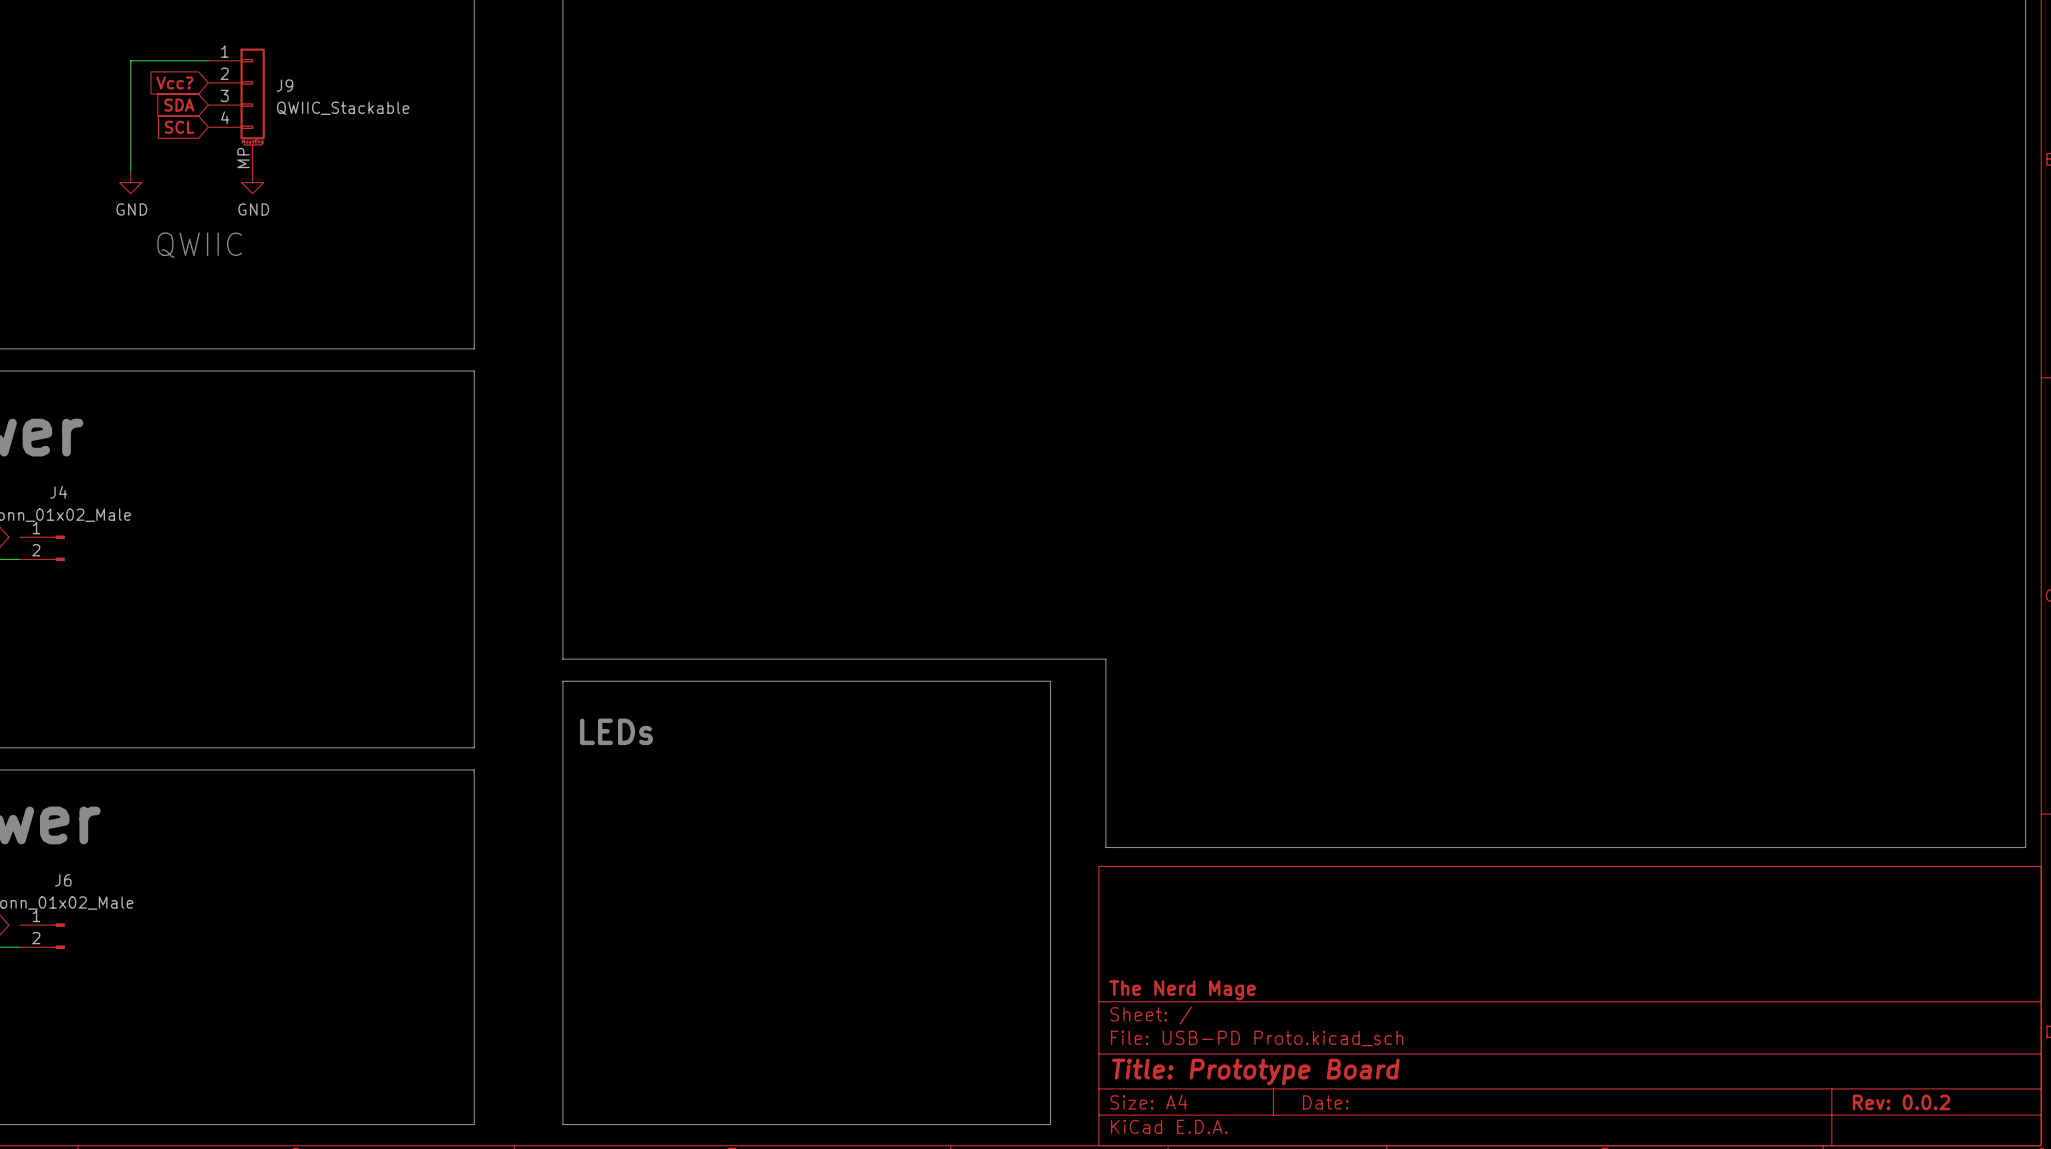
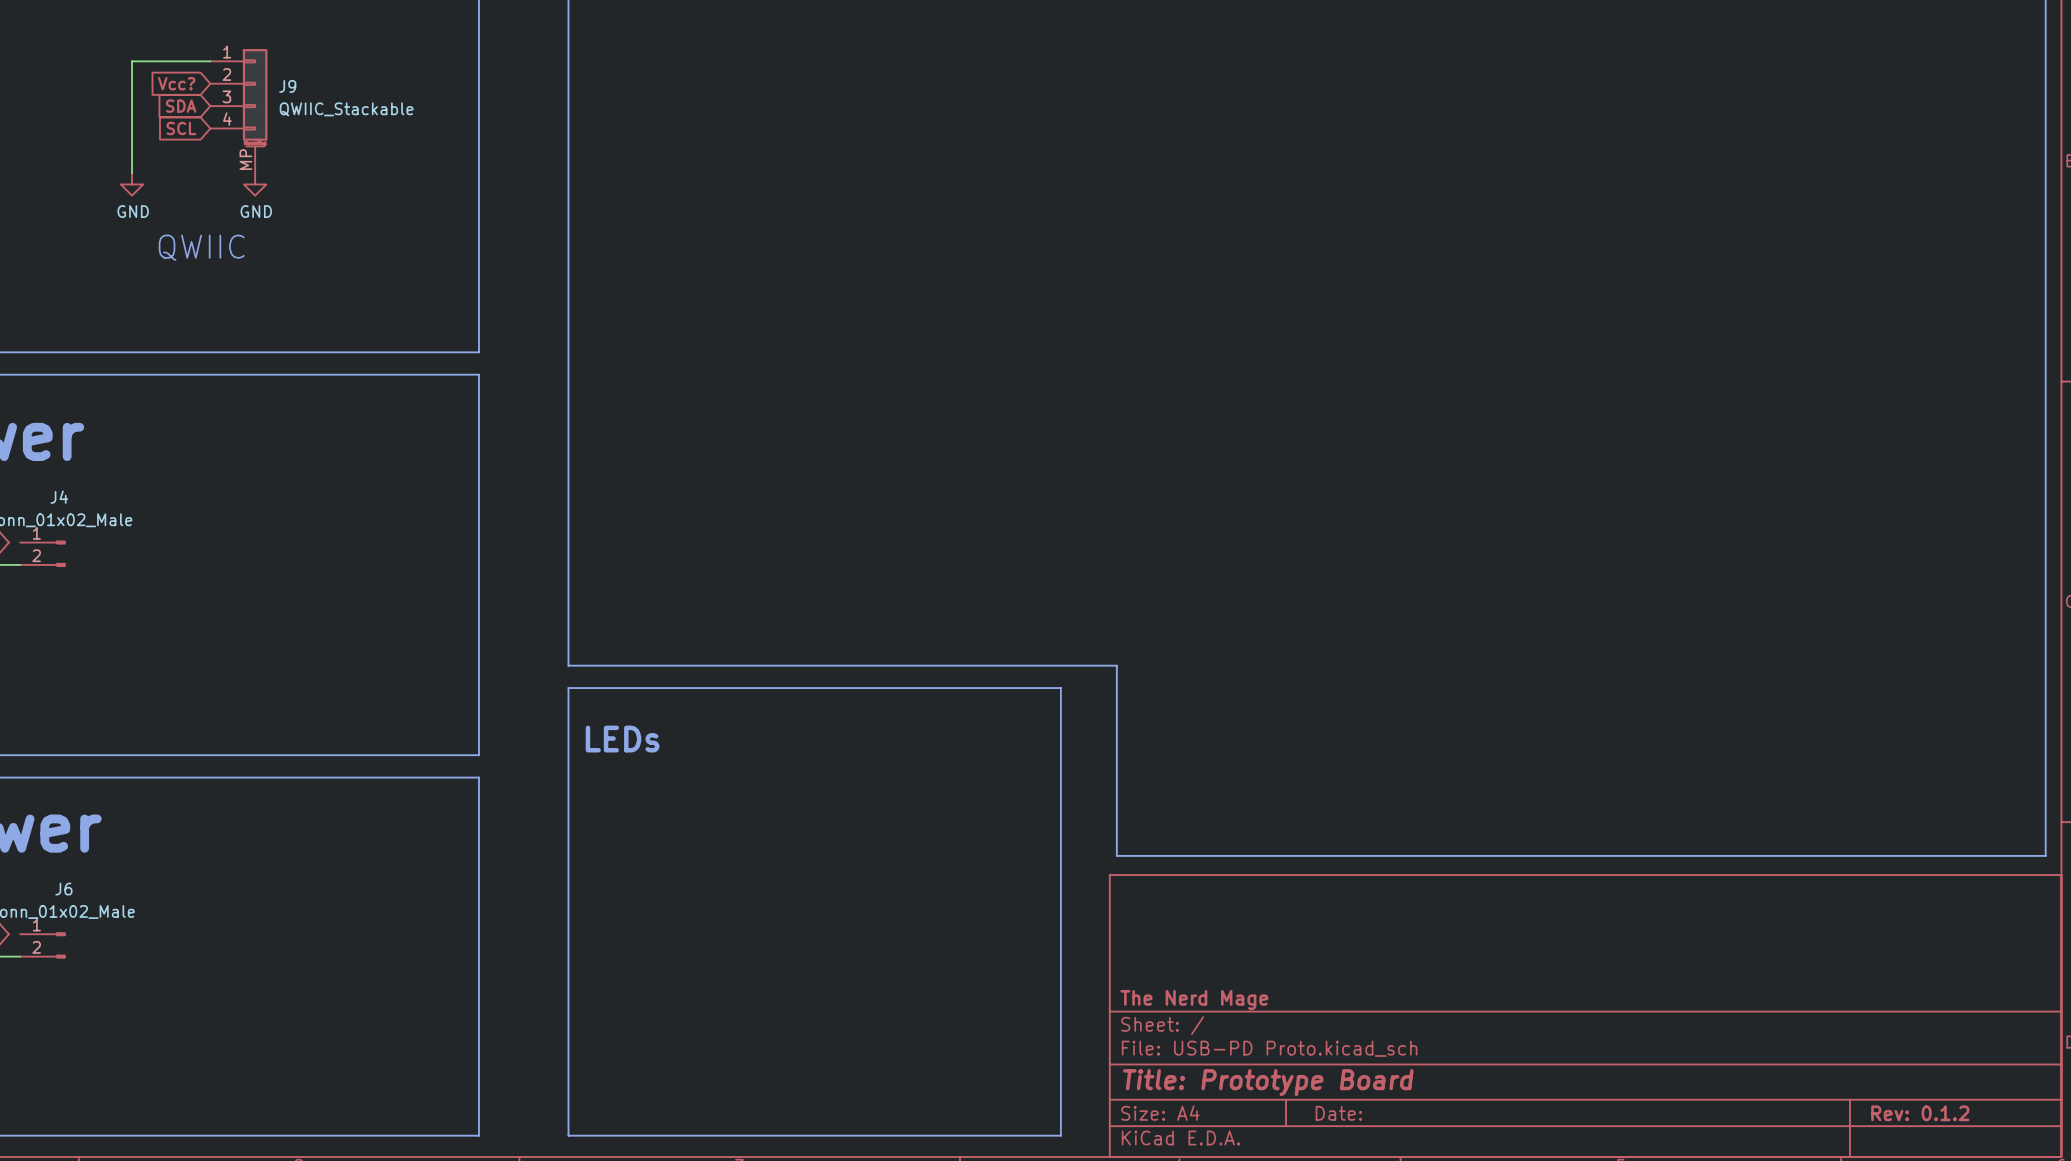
title block: Rev: 0.0.2 (1901, 1102) -> Rev: 0.1.2 (1920, 1113)

